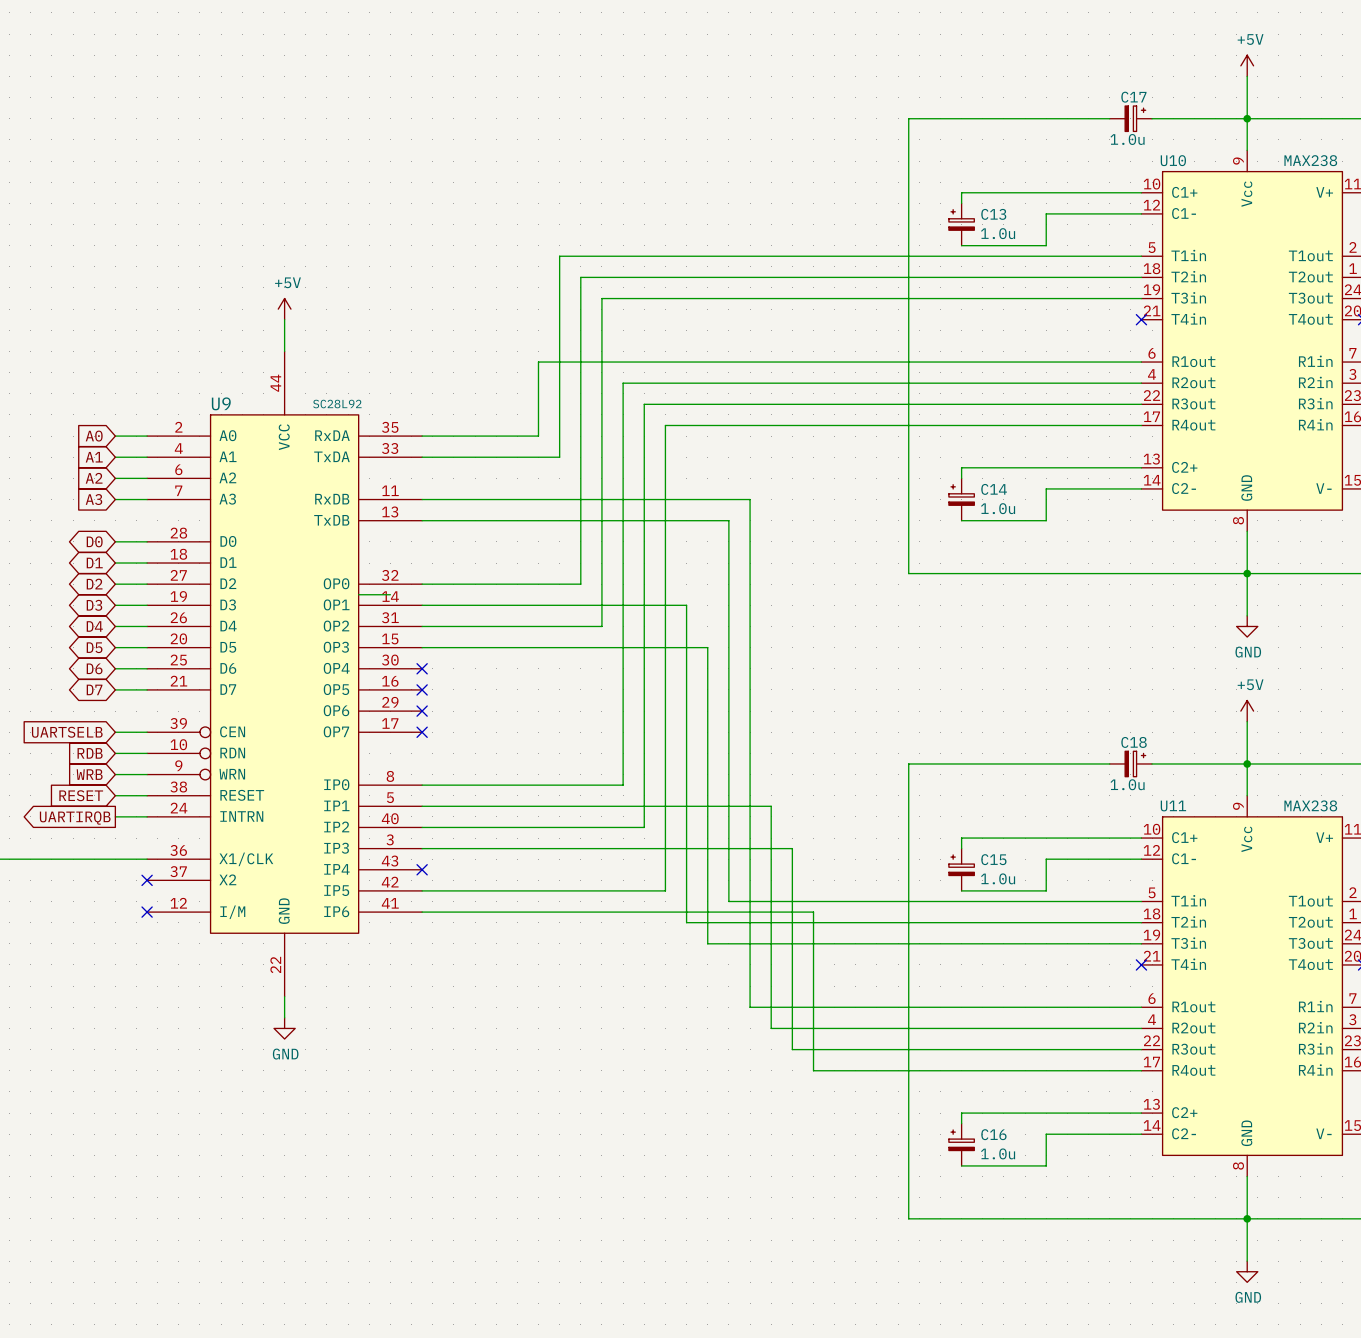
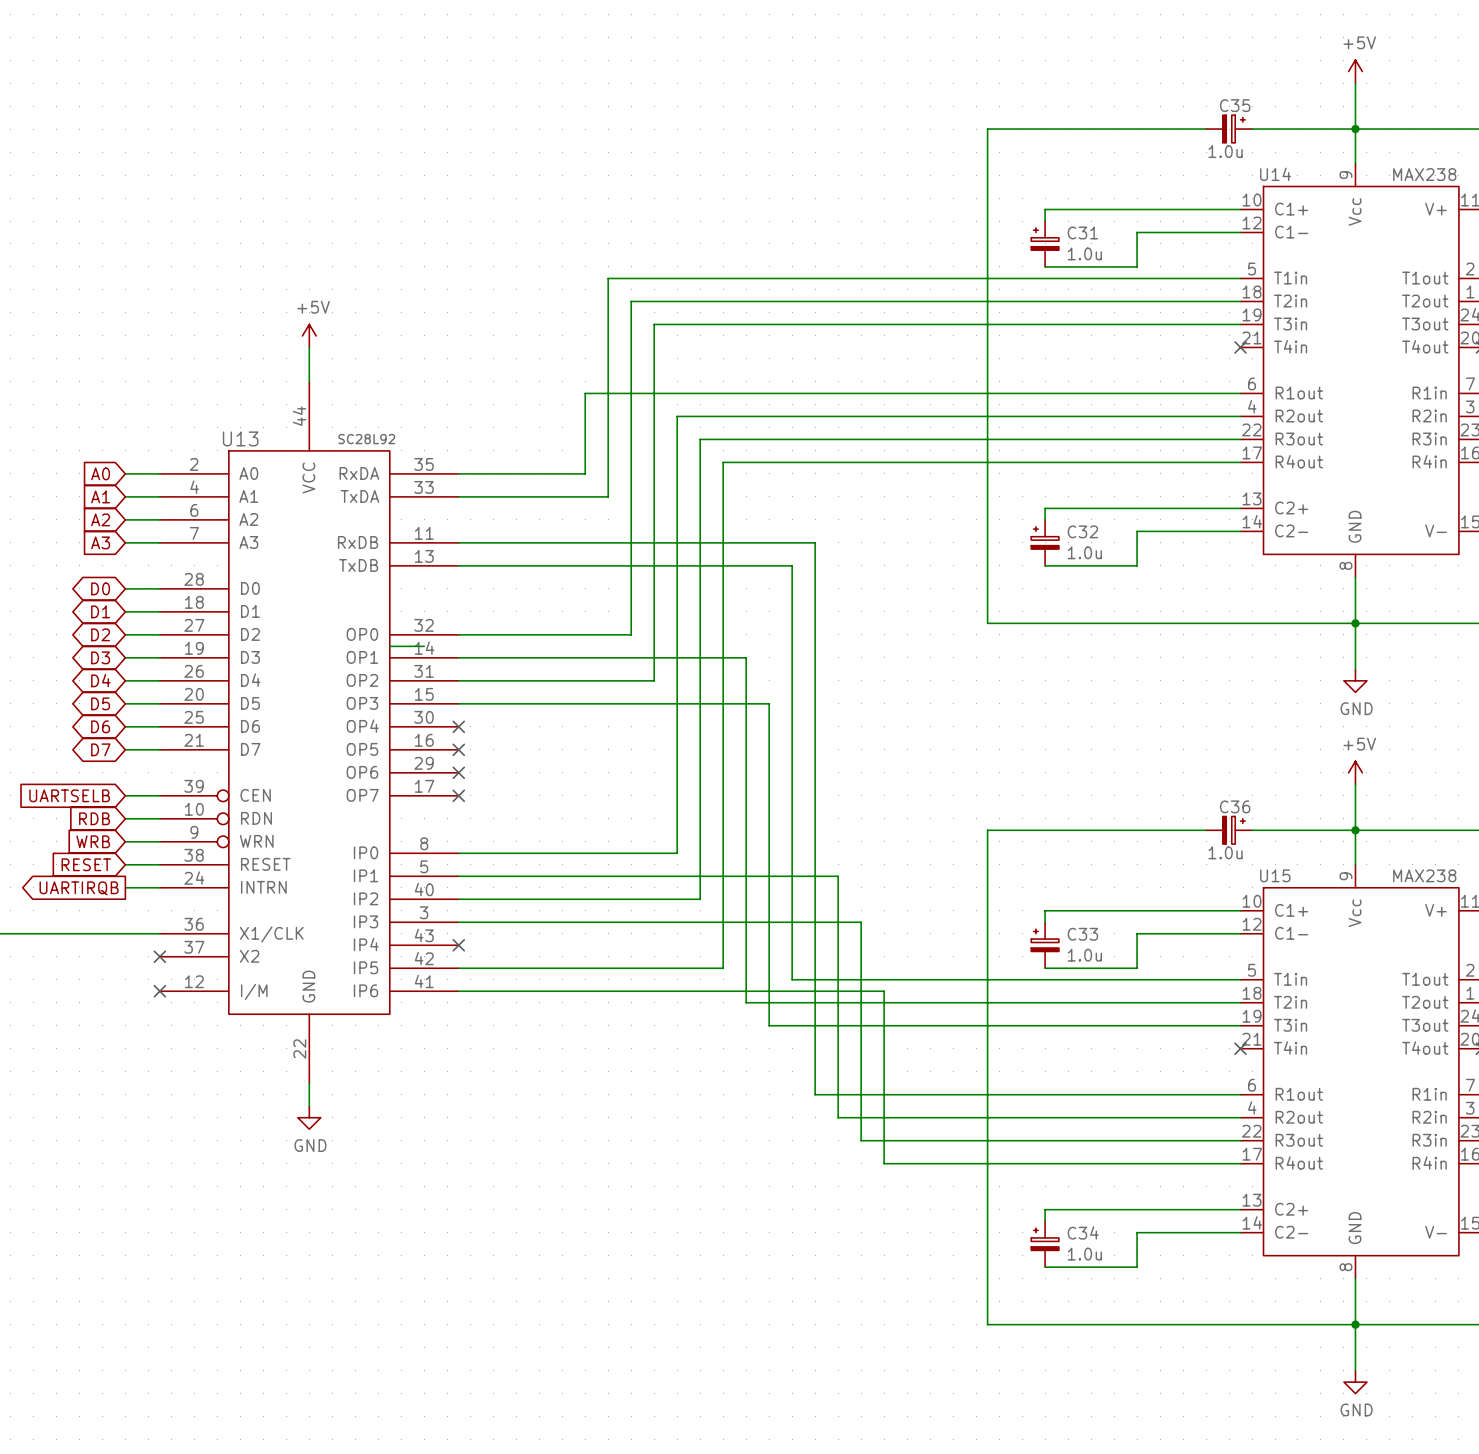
C17 name: C17 (1133, 97) -> C35 (1235, 105)
U10 name: U10 (1173, 160) -> U14 (1275, 174)
C13 name: C13 (993, 214) -> C31 (1082, 232)
U9 name: U9 (221, 403) -> U13 (240, 438)
C14 name: C14 (994, 489) -> C32 (1082, 531)
C18 name: C18 (1134, 742) -> C36 (1235, 806)
U11 name: U11 (1173, 805) -> U15 (1275, 875)
C15 name: C15 (993, 859) -> C33 (1082, 934)
C16 name: C16 (993, 1134) -> C34 (1083, 1232)

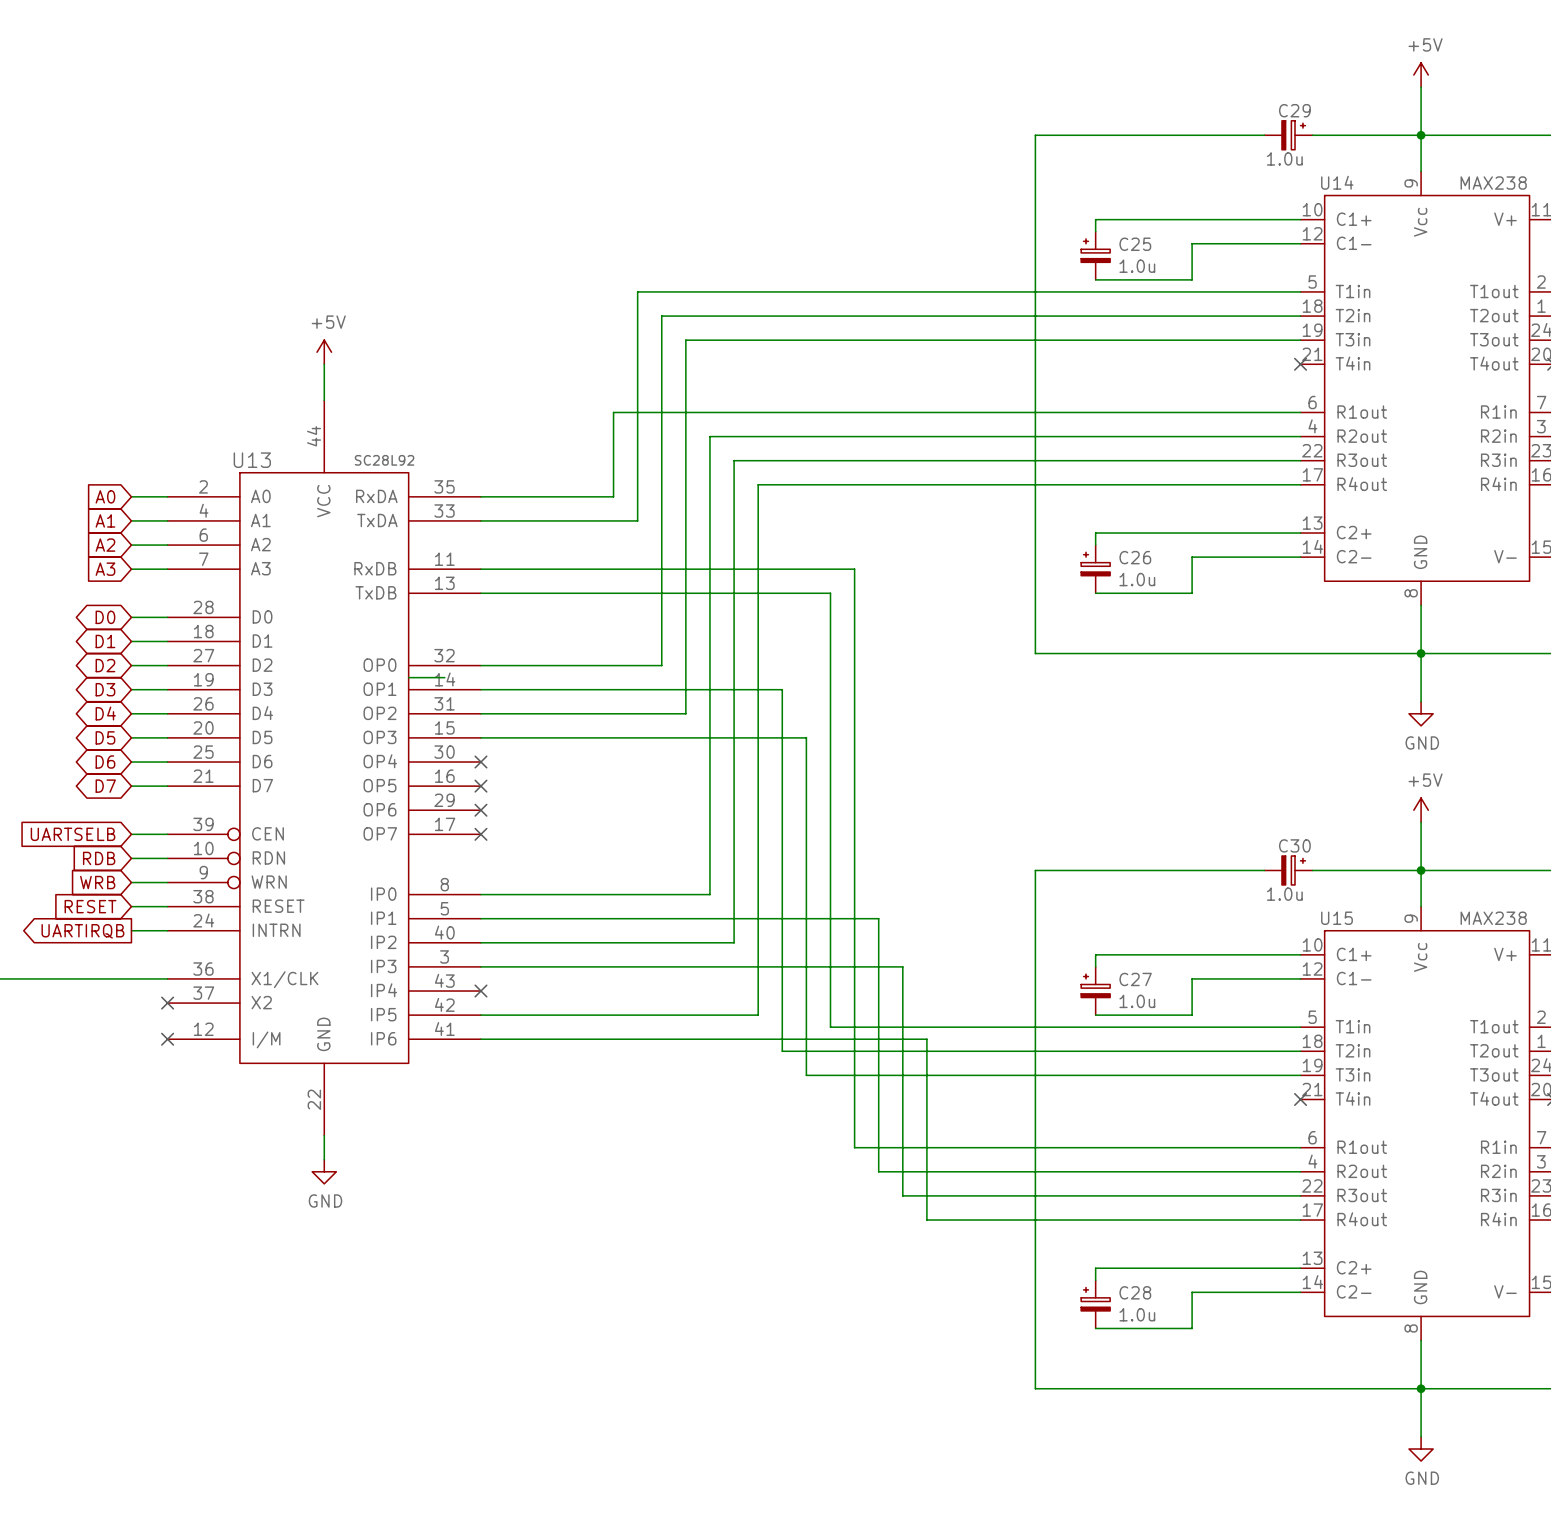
C35 name: C35 (1235, 105) -> C29 (1294, 110)
C31 name: C31 (1082, 232) -> C25 (1135, 244)
C32 name: C32 (1082, 531) -> C26 (1135, 557)
C36 name: C36 (1235, 806) -> C30 (1294, 845)
C33 name: C33 (1082, 934) -> C27 (1135, 979)
C34 name: C34 (1083, 1232) -> C28 (1135, 1292)

